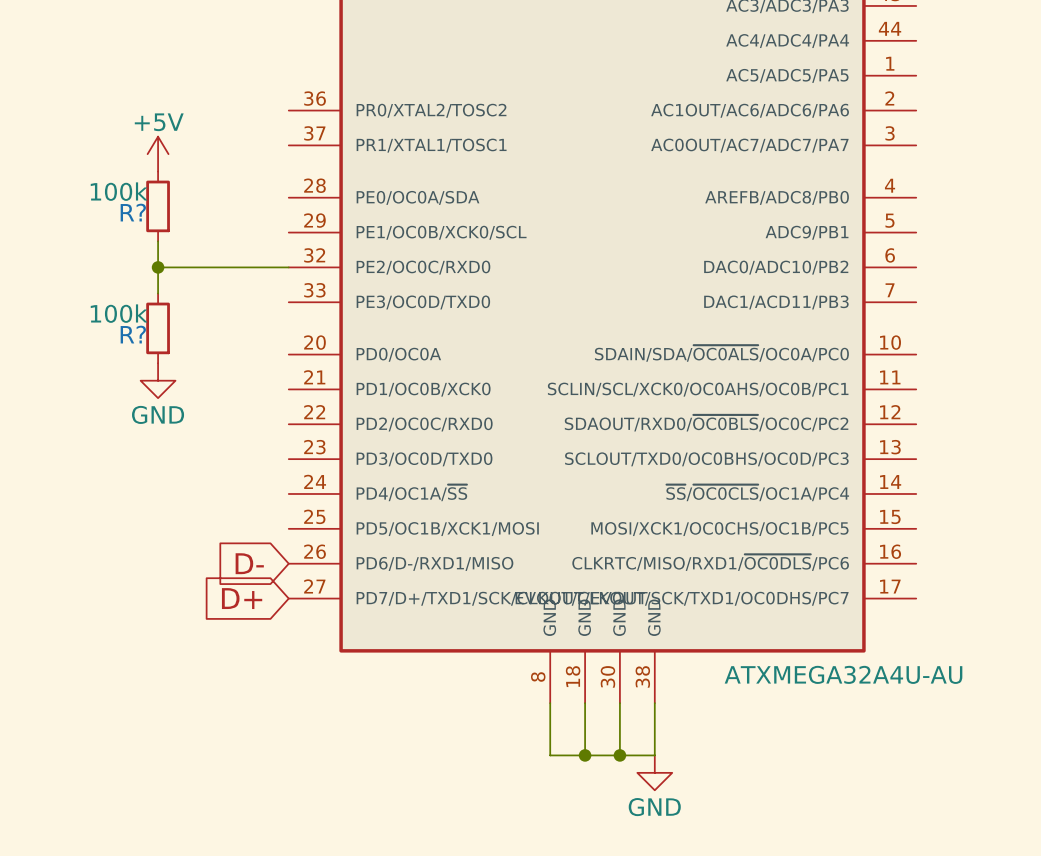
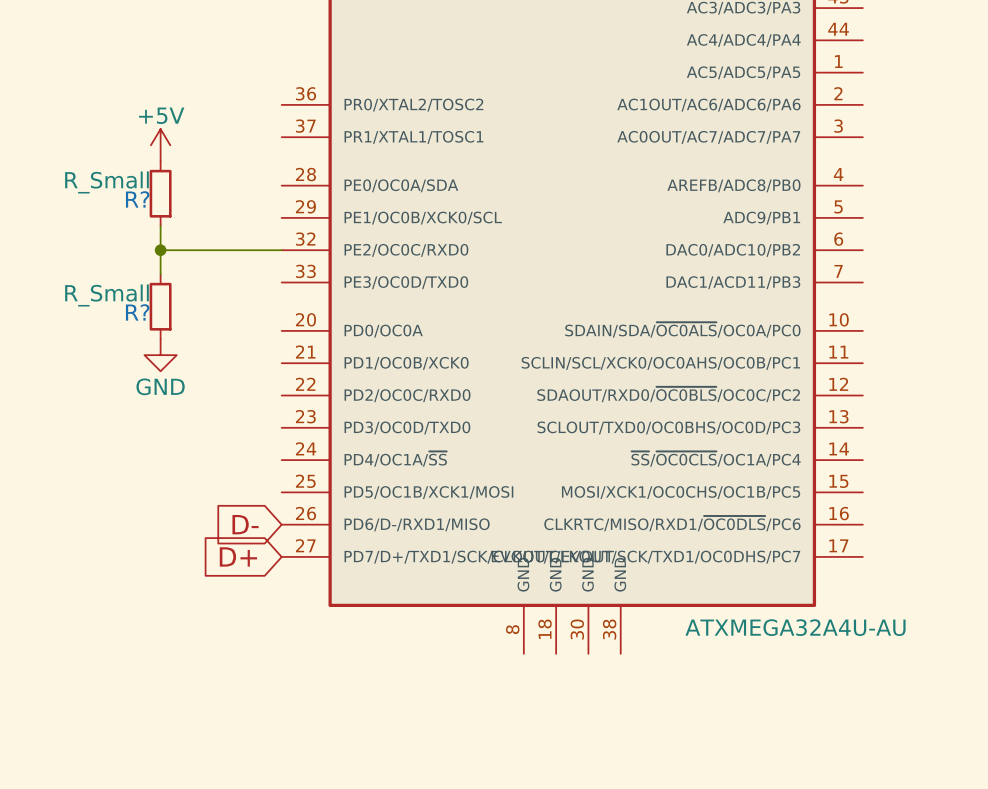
R? value: 100k (119, 191) -> R_Small (106, 182)
R? value: 100k (119, 313) -> R_Small (106, 295)
wire: (550, 703) (550, 755) (654, 755) (654, 703) -> none
wire: (585, 703) (585, 755) -> none
wire: (619, 703) (619, 755) -> none
junction: (585, 755) -> none
junction: (619, 755) -> none
power symbol: GND (654, 772) -> none

